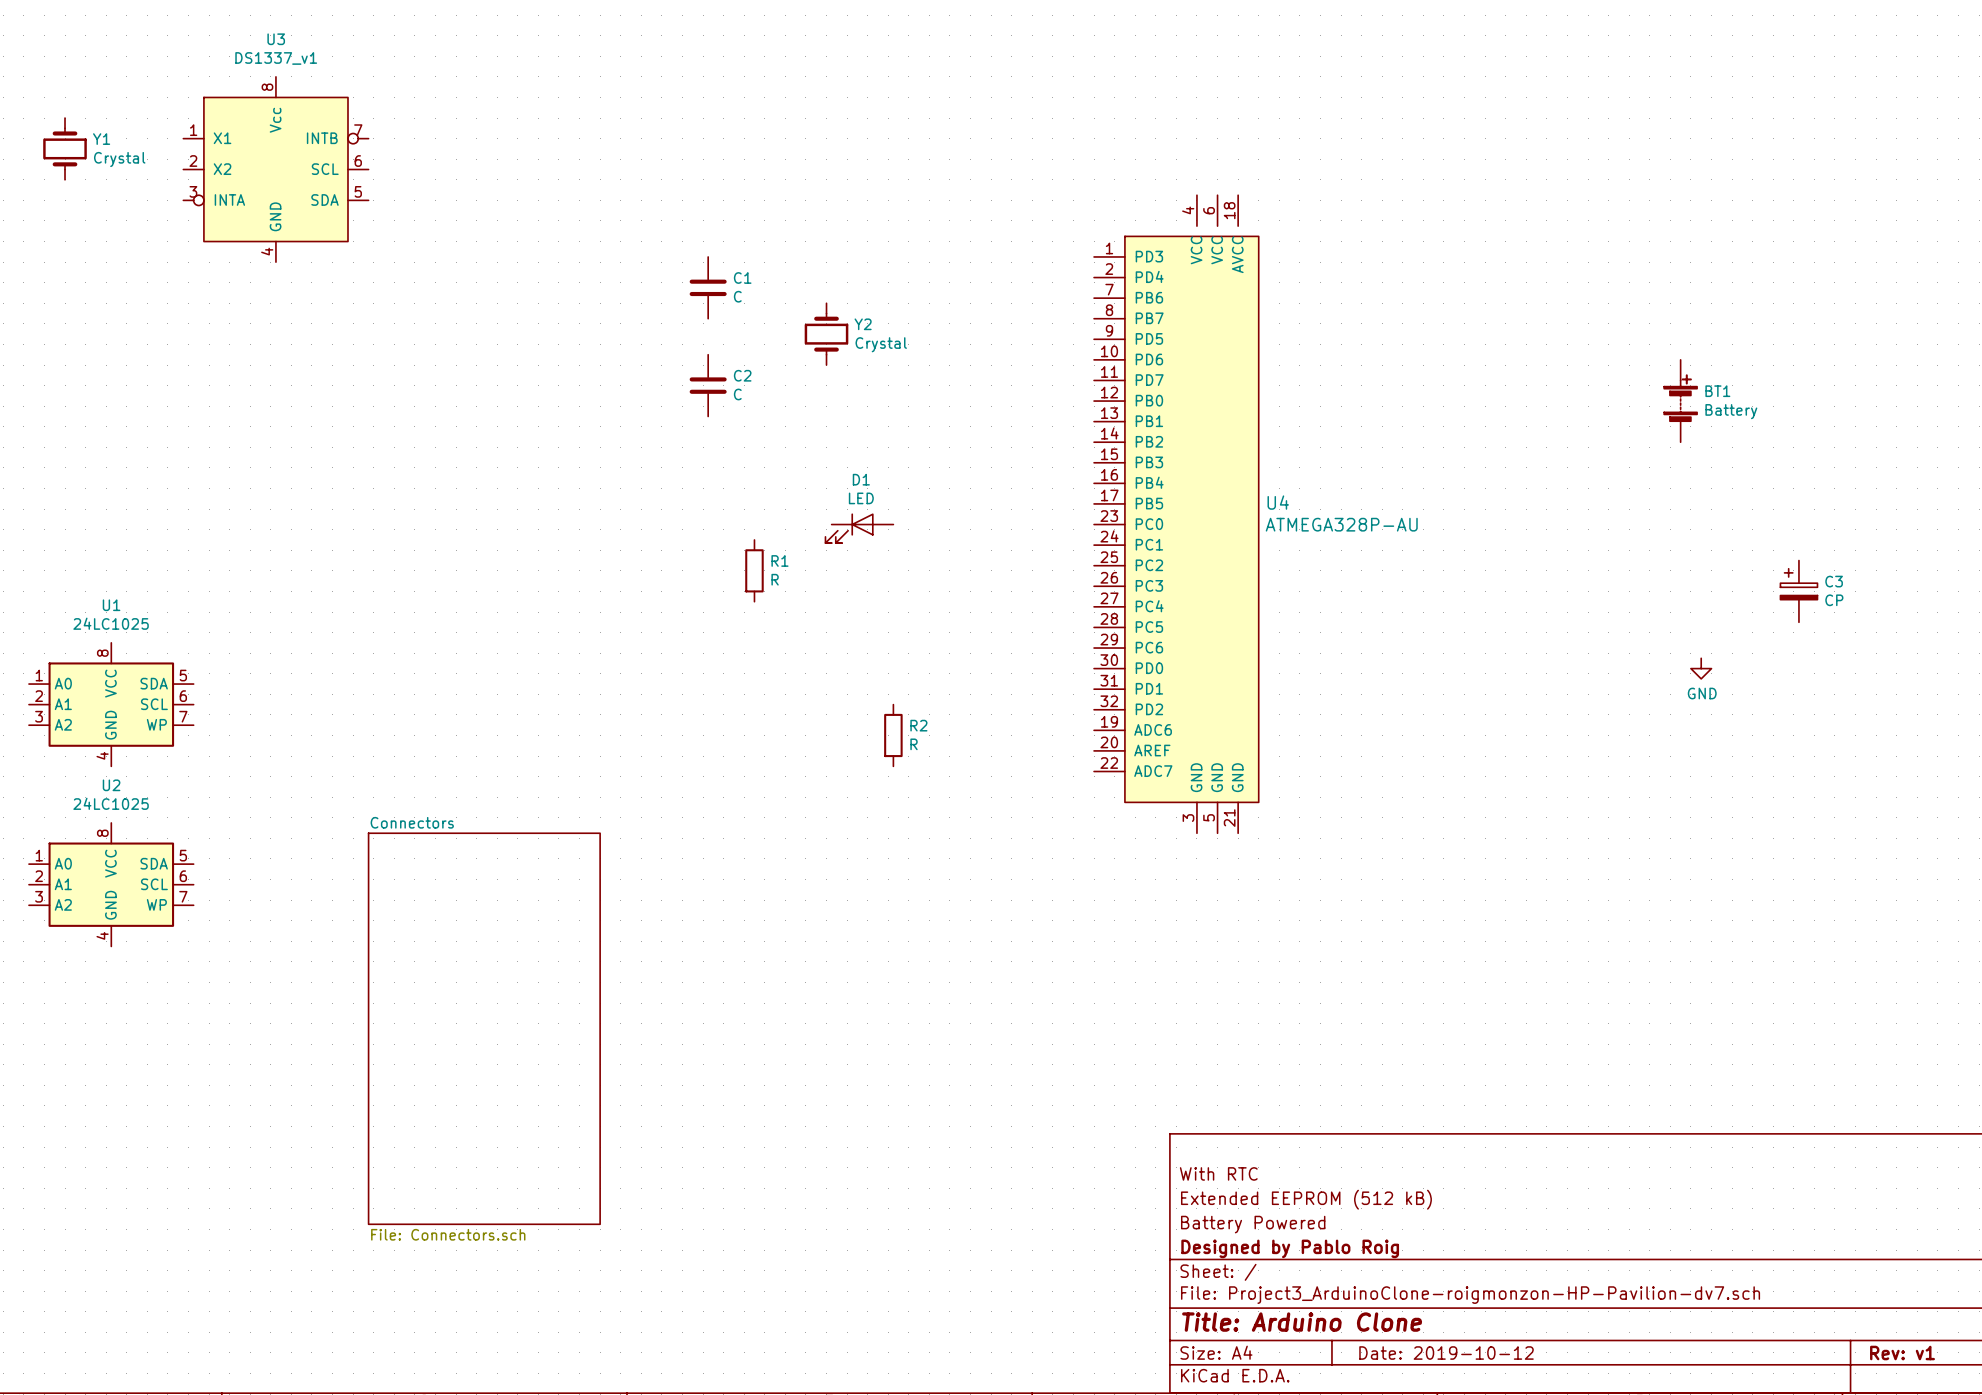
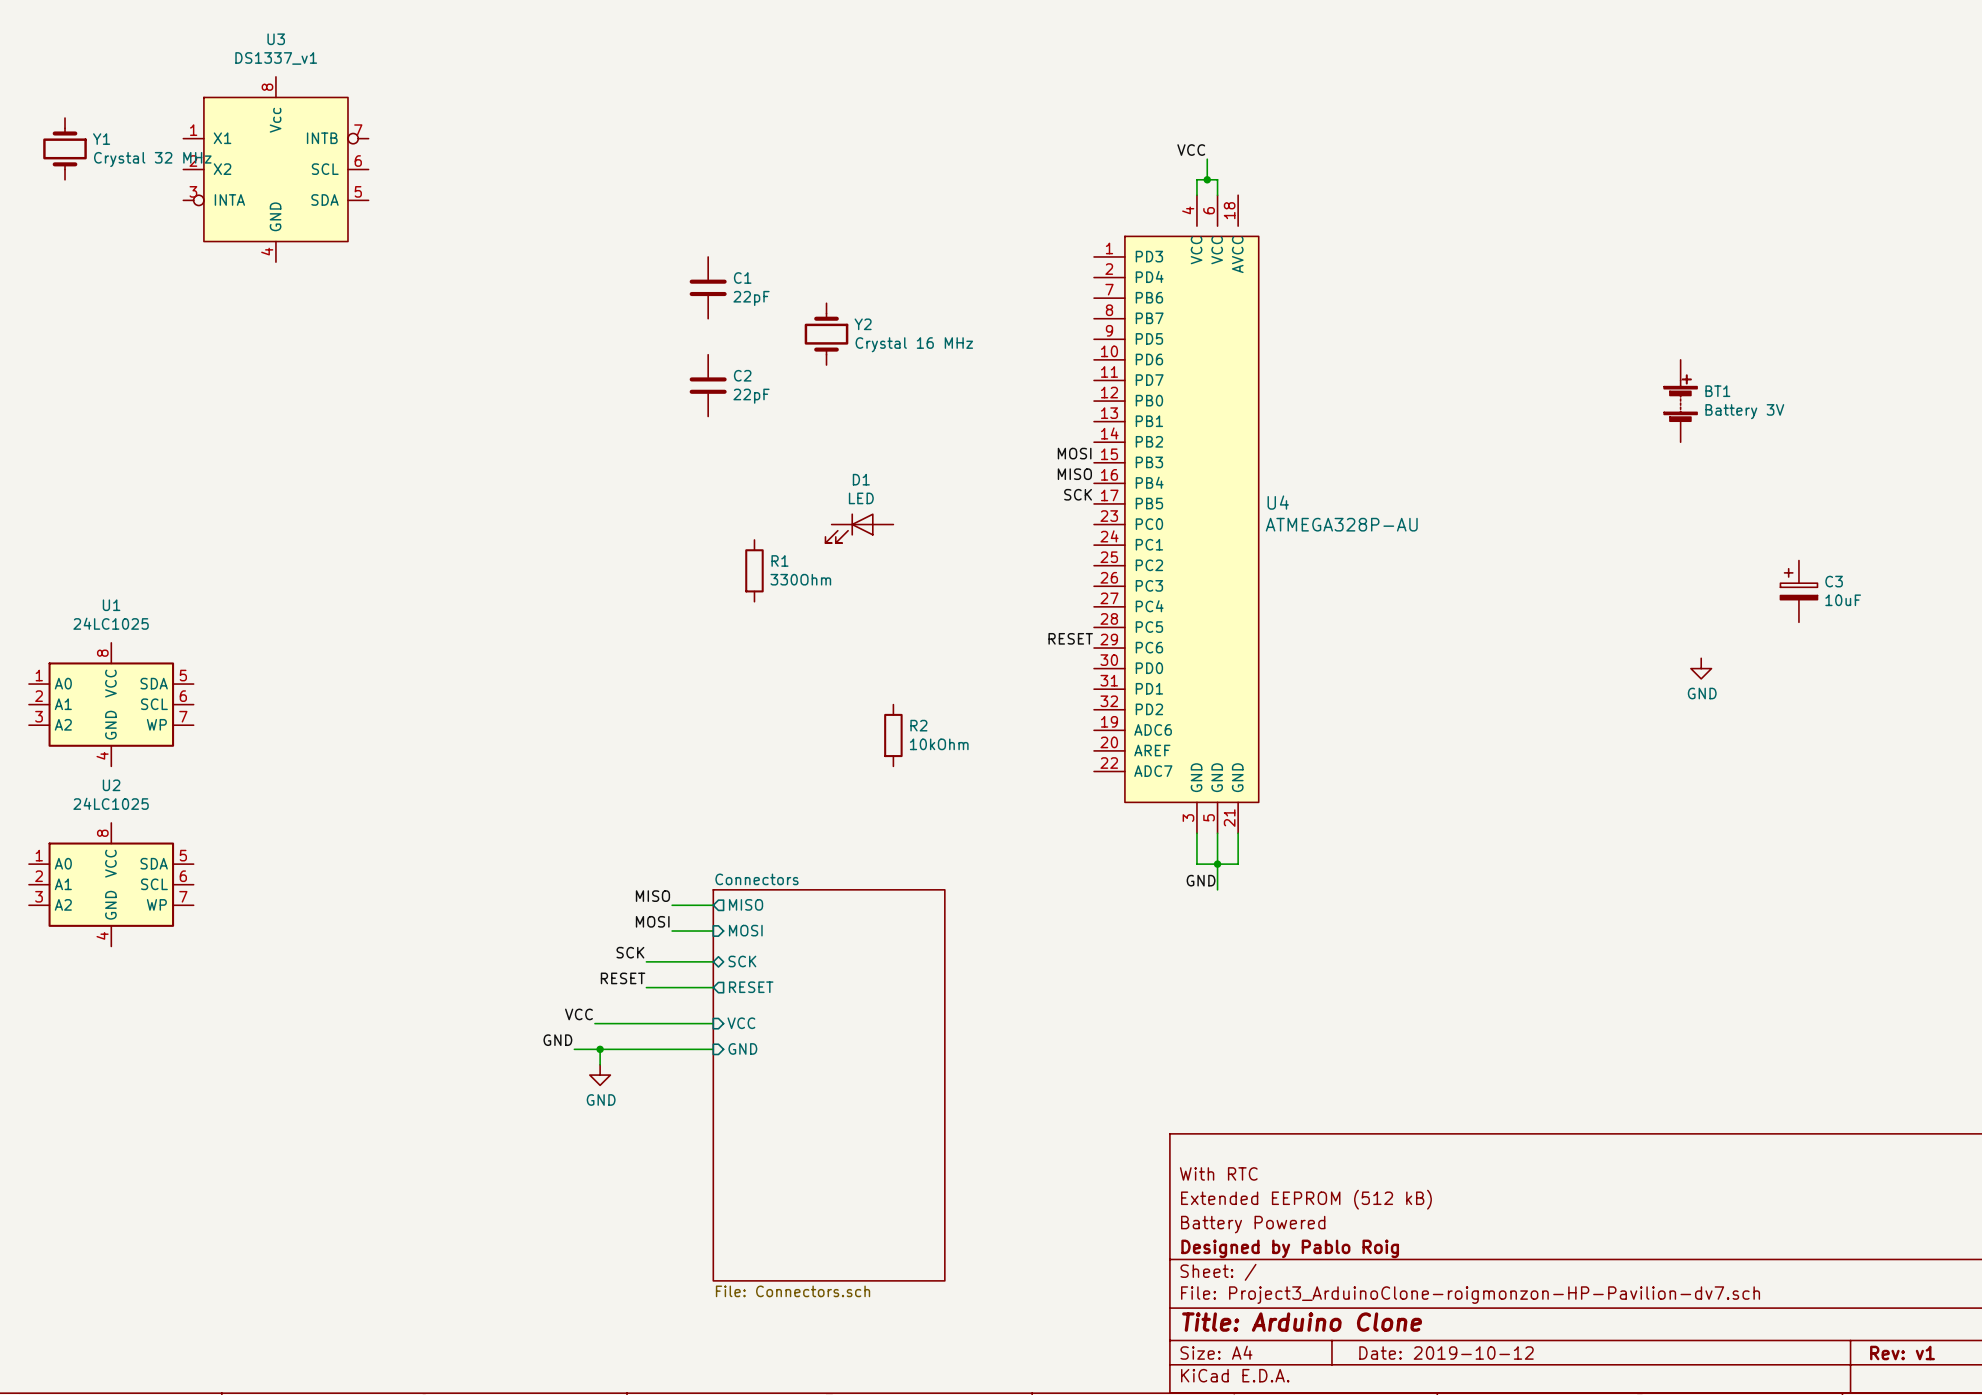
label: none -> VCC (1191, 150)
Y1 value: Crystal (119, 159) -> Crystal 32 MHz (152, 159)
wire: none -> (1207, 159) (1207, 179)
junction: none -> (1207, 179)
wire: none -> (1196, 195) (1196, 179) (1217, 179) (1217, 195)
C1 value: C (737, 296) -> 22pF (751, 298)
Y2 value: Crystal (881, 344) -> Crystal 16 MHz (914, 344)
C2 value: C (737, 394) -> 22pF (751, 396)
BT1 value: Battery (1731, 411) -> Battery 3V (1744, 411)
label: none -> MOSI (1074, 453)
label: none -> MISO (1074, 474)
label: none -> SCK (1078, 494)
R1 value: R (775, 579) -> 330Ohm (800, 579)
C3 value: CP (1834, 600) -> 10uF (1843, 600)
label: none -> RESET (1070, 638)
R2 value: R (914, 744) -> 10kOhm (939, 744)
wire: none -> (1196, 833) (1196, 864) (1238, 864) (1238, 833)
wire: none -> (1217, 833) (1217, 889)
junction: none -> (1217, 864)
label: none -> GND (1201, 880)
label: none -> MISO (652, 896)
sheet pin: none -> MISO (746, 904)
wire: none -> (672, 905) (713, 905)
label: none -> MOSI (652, 921)
sheet pin: none -> MOSI (745, 930)
wire: none -> (672, 931) (713, 931)
label: none -> SCK (630, 952)
wire: none -> (646, 961) (713, 961)
sheet pin: none -> SCK (742, 961)
label: none -> RESET (623, 978)
wire: none -> (646, 987) (713, 987)
sheet pin: none -> RESET (751, 987)
label: none -> VCC (578, 1014)
wire: none -> (594, 1023) (713, 1023)
sheet pin: none -> VCC (741, 1023)
sheet Connectors: File: Connectors.sch (484, 1028) -> none
label: none -> GND (557, 1040)
sheet pin: none -> GND (742, 1048)
wire: none -> (574, 1049) (713, 1049)
junction: none -> (600, 1049)
power symbol: none -> GND (600, 1075)
sheet Connectors: none -> File: Connectors.sch (829, 1085)

